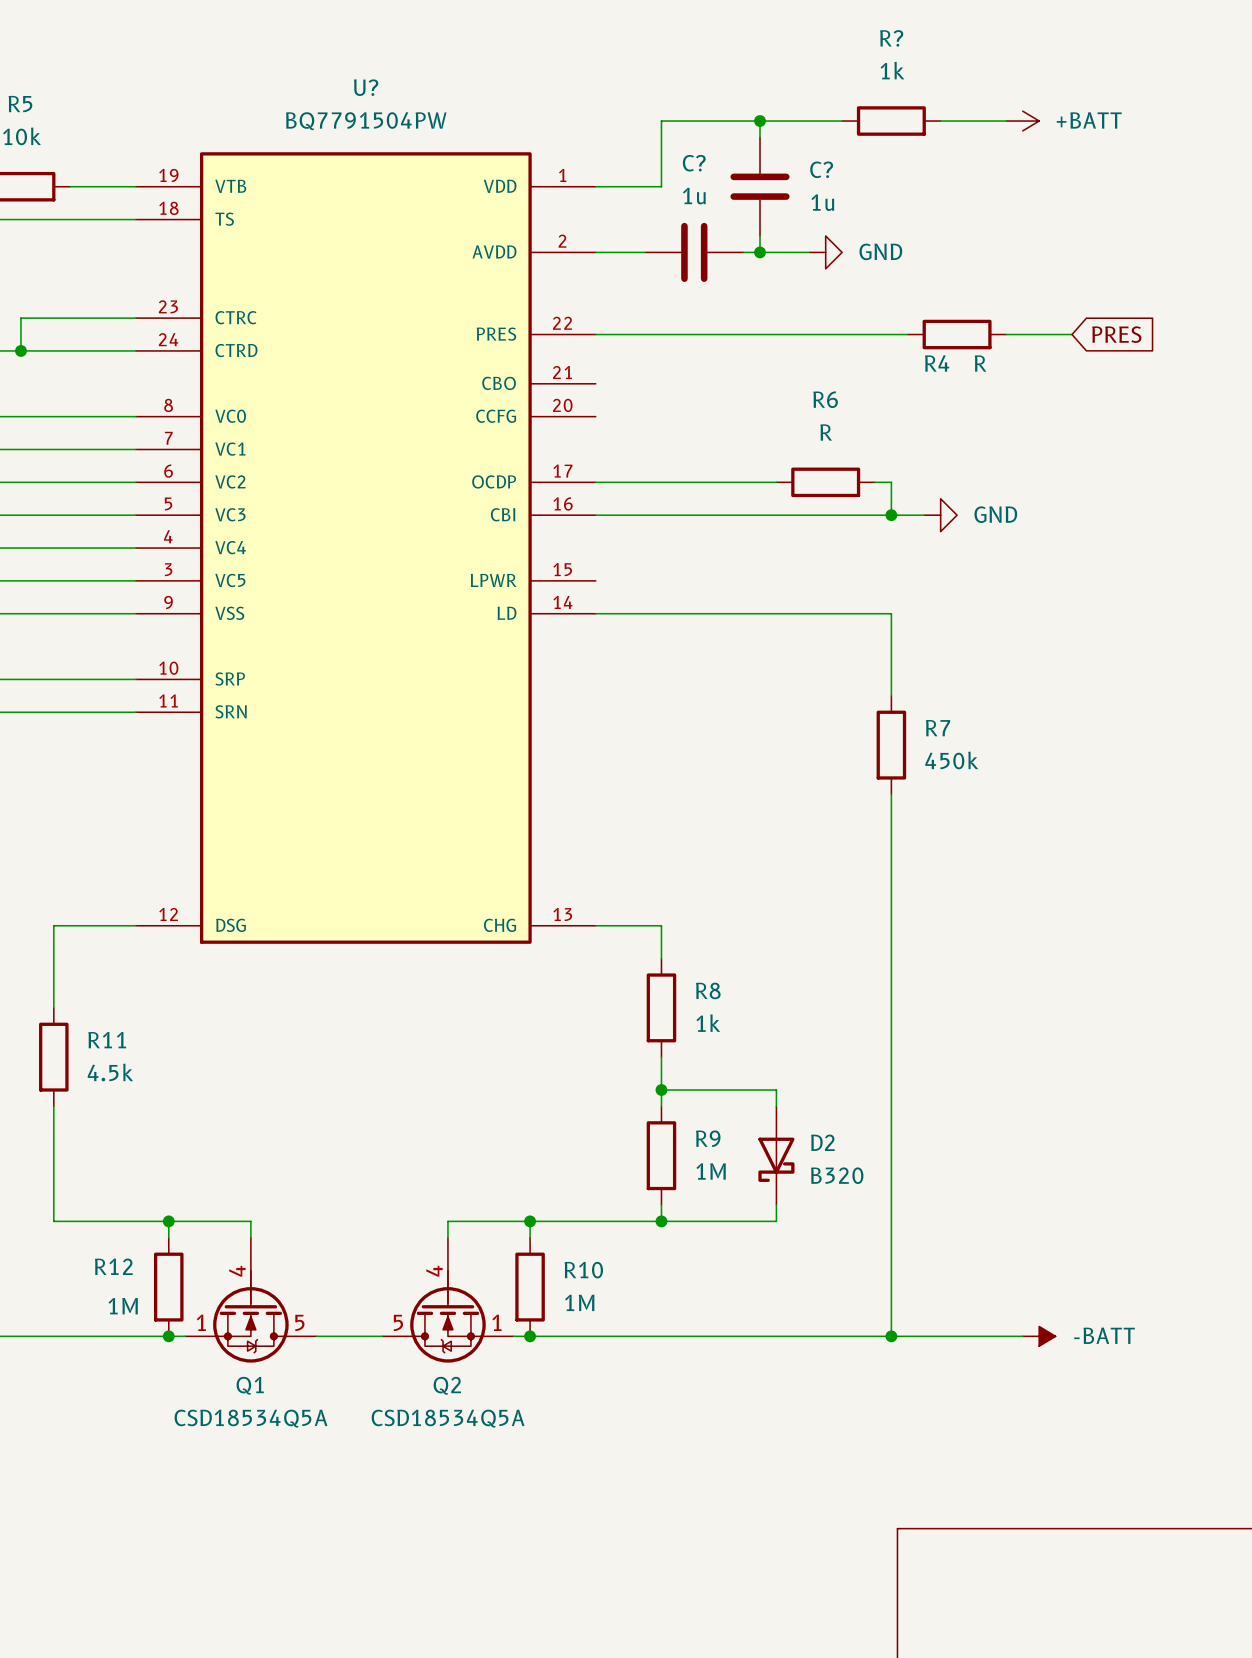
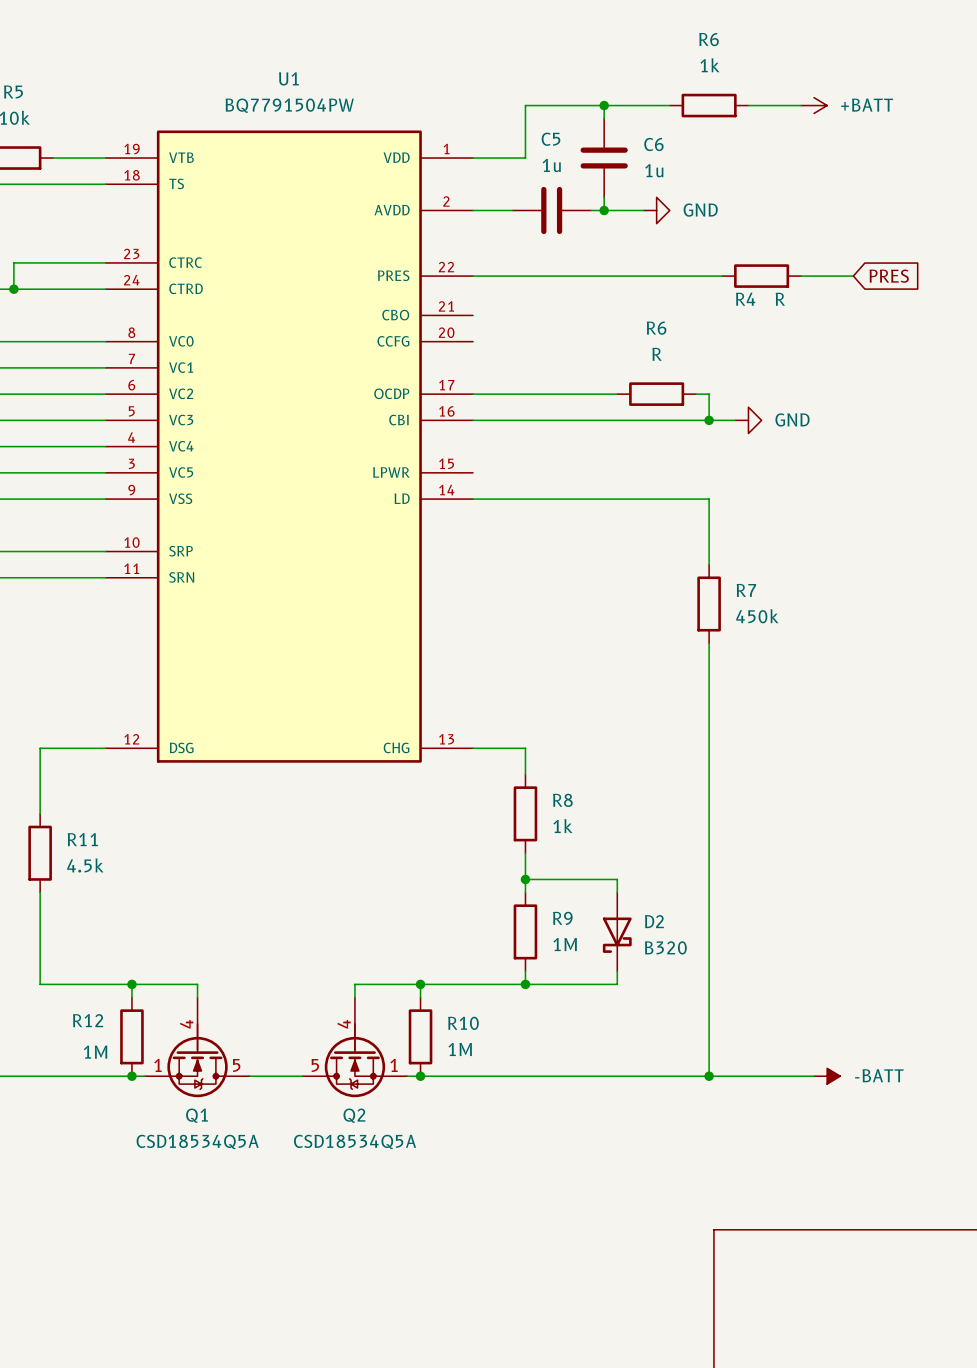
R? name: R? (891, 38) -> R6 (709, 39)
U? name: U? (366, 87) -> U1 (288, 78)
C? name: C? (694, 163) -> C5 (551, 139)
C? name: C? (821, 169) -> C6 (653, 144)

